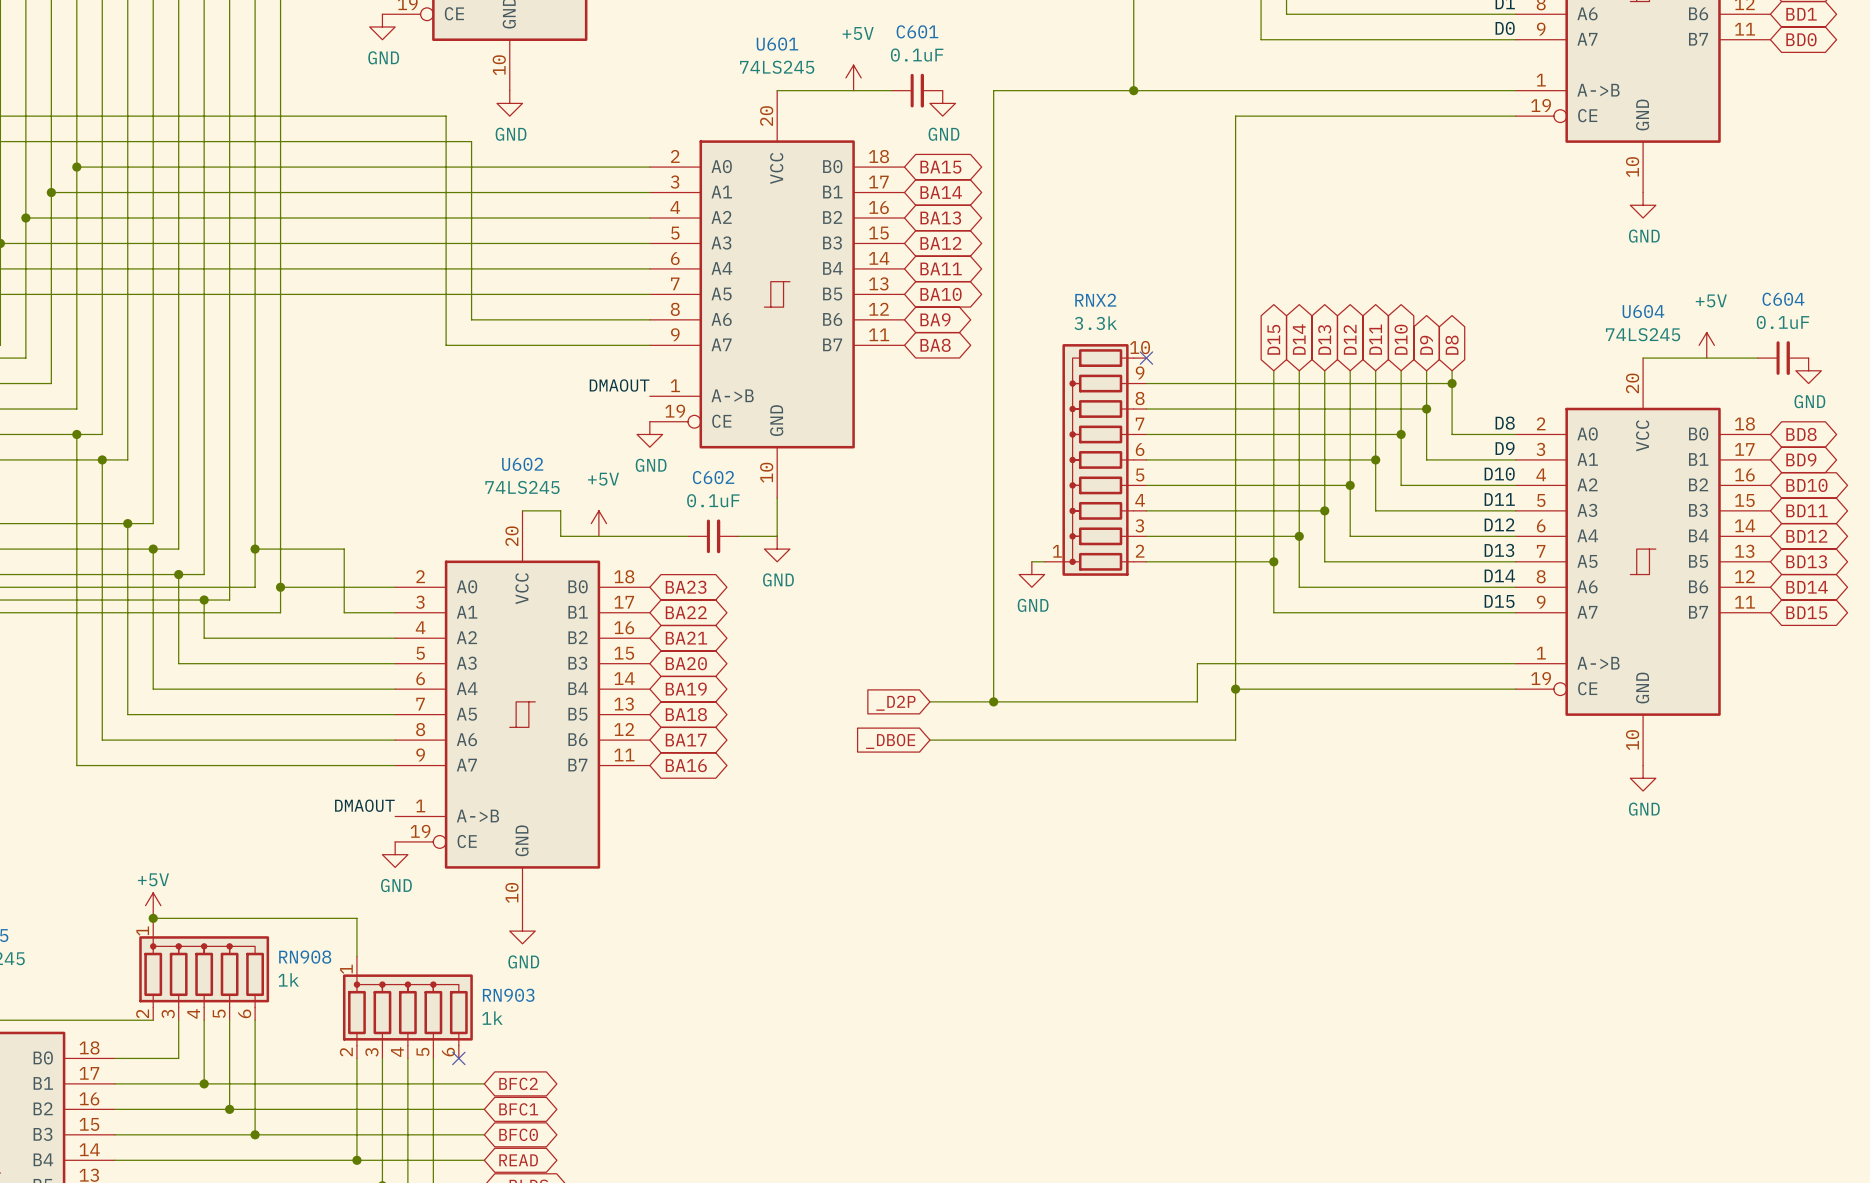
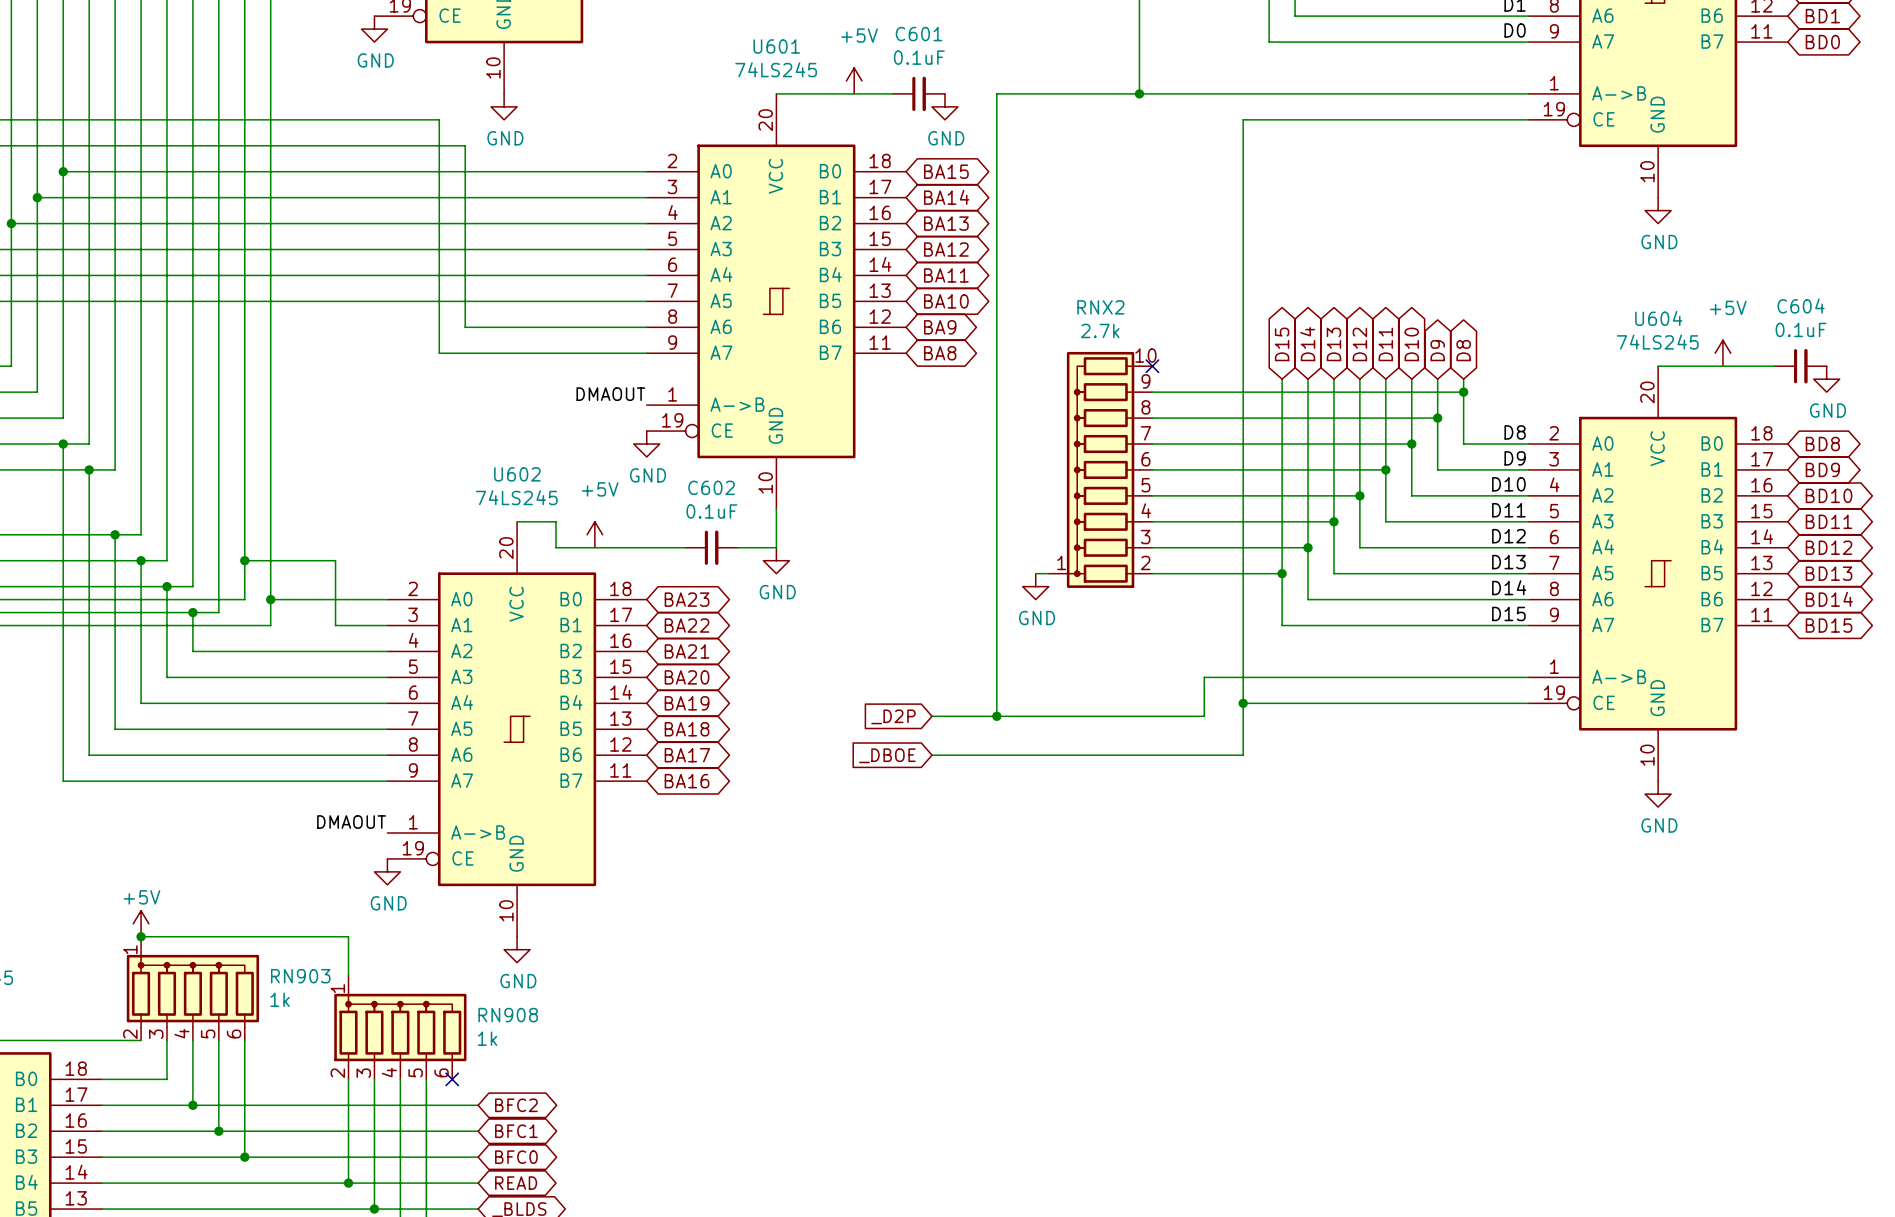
RNX2 value: 3.3k (1095, 323) -> 2.7k (1100, 330)
RN908 name: RN908 (305, 957) -> RN903 (300, 976)
RN903 name: RN903 (508, 995) -> RN908 (508, 1015)

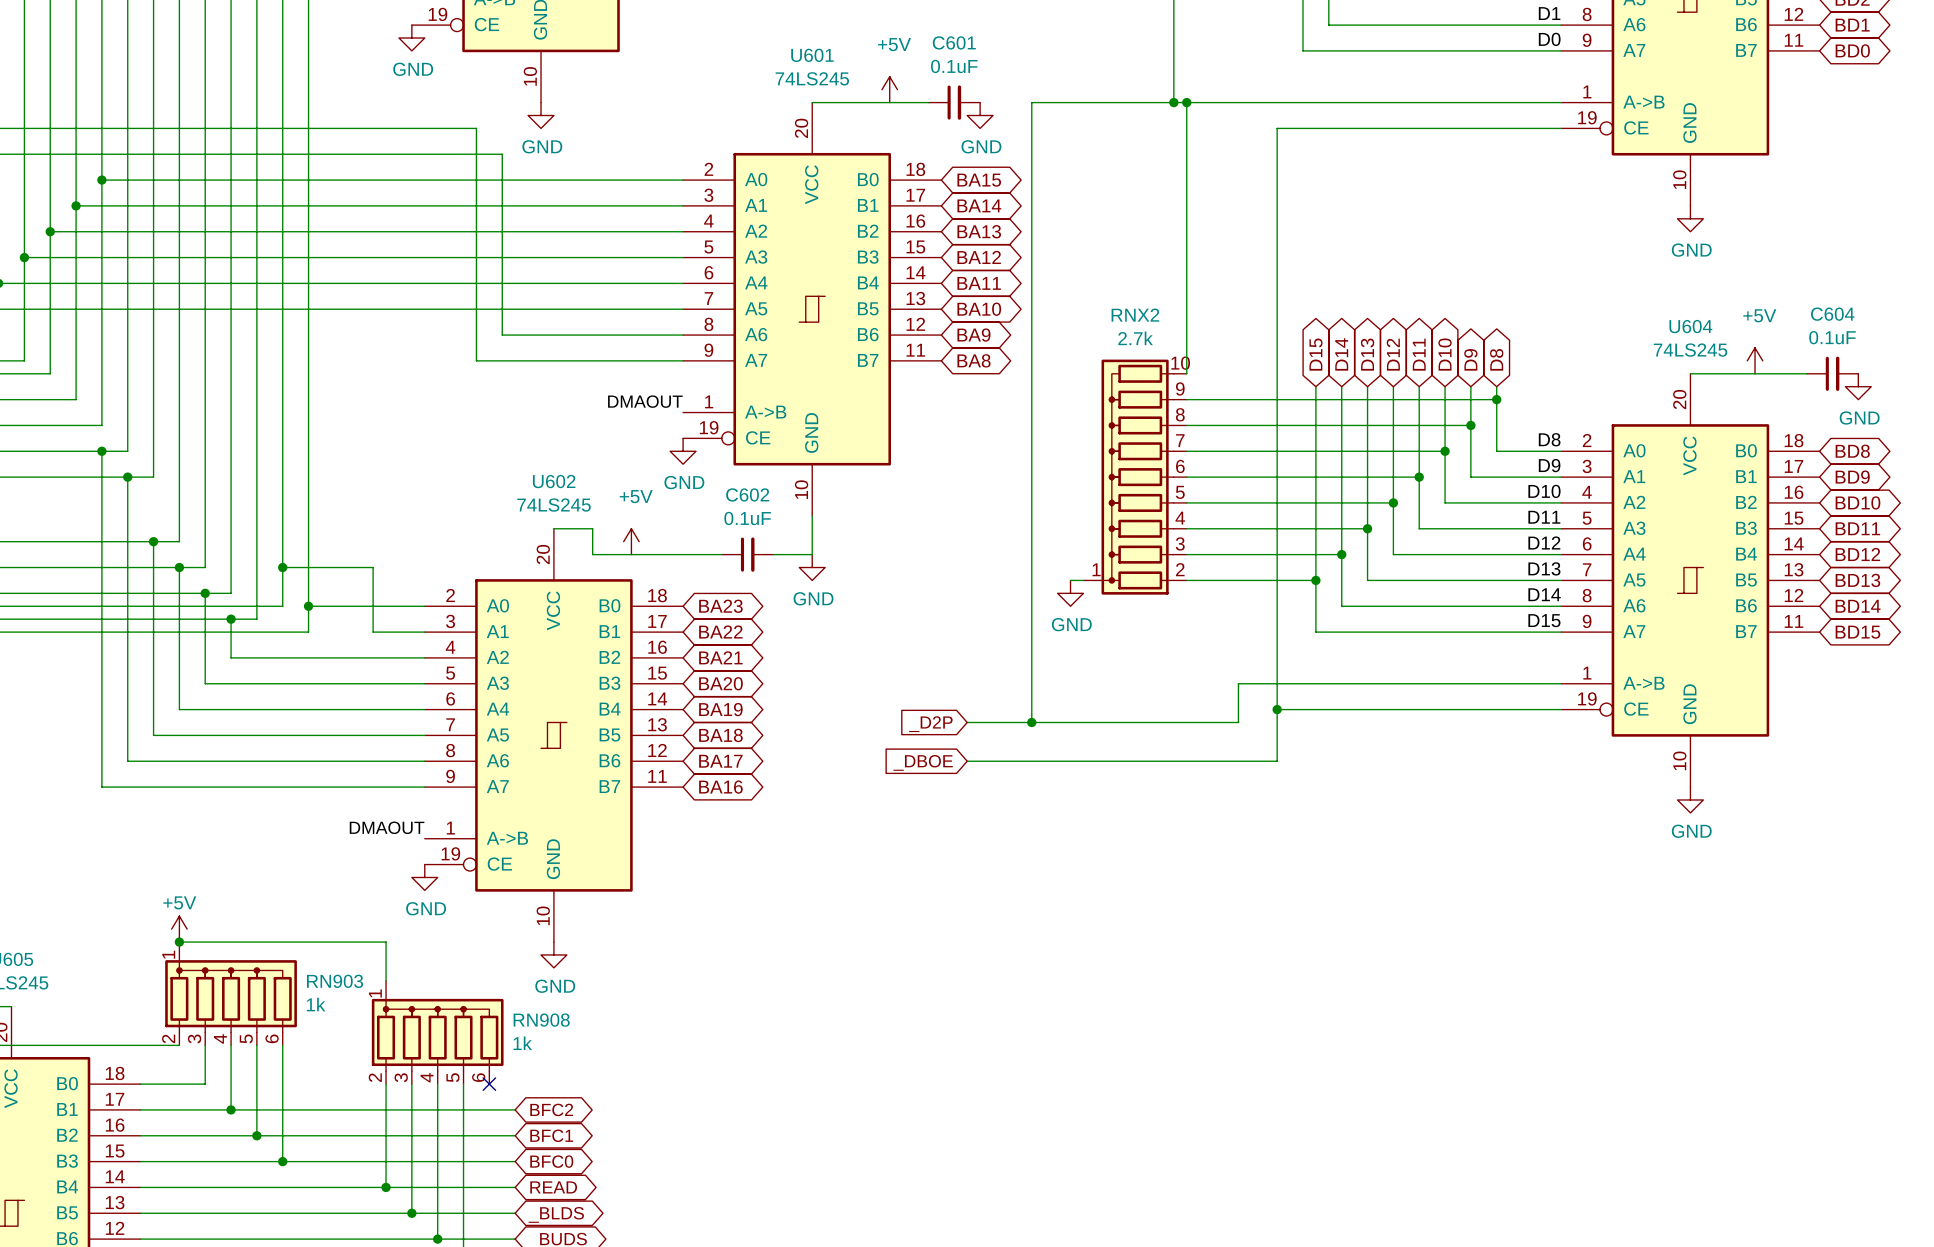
wire: none -> (1186, 102) (1186, 373)
junction: none -> (1186, 102)
no-connect mark: (1152, 366) -> none

